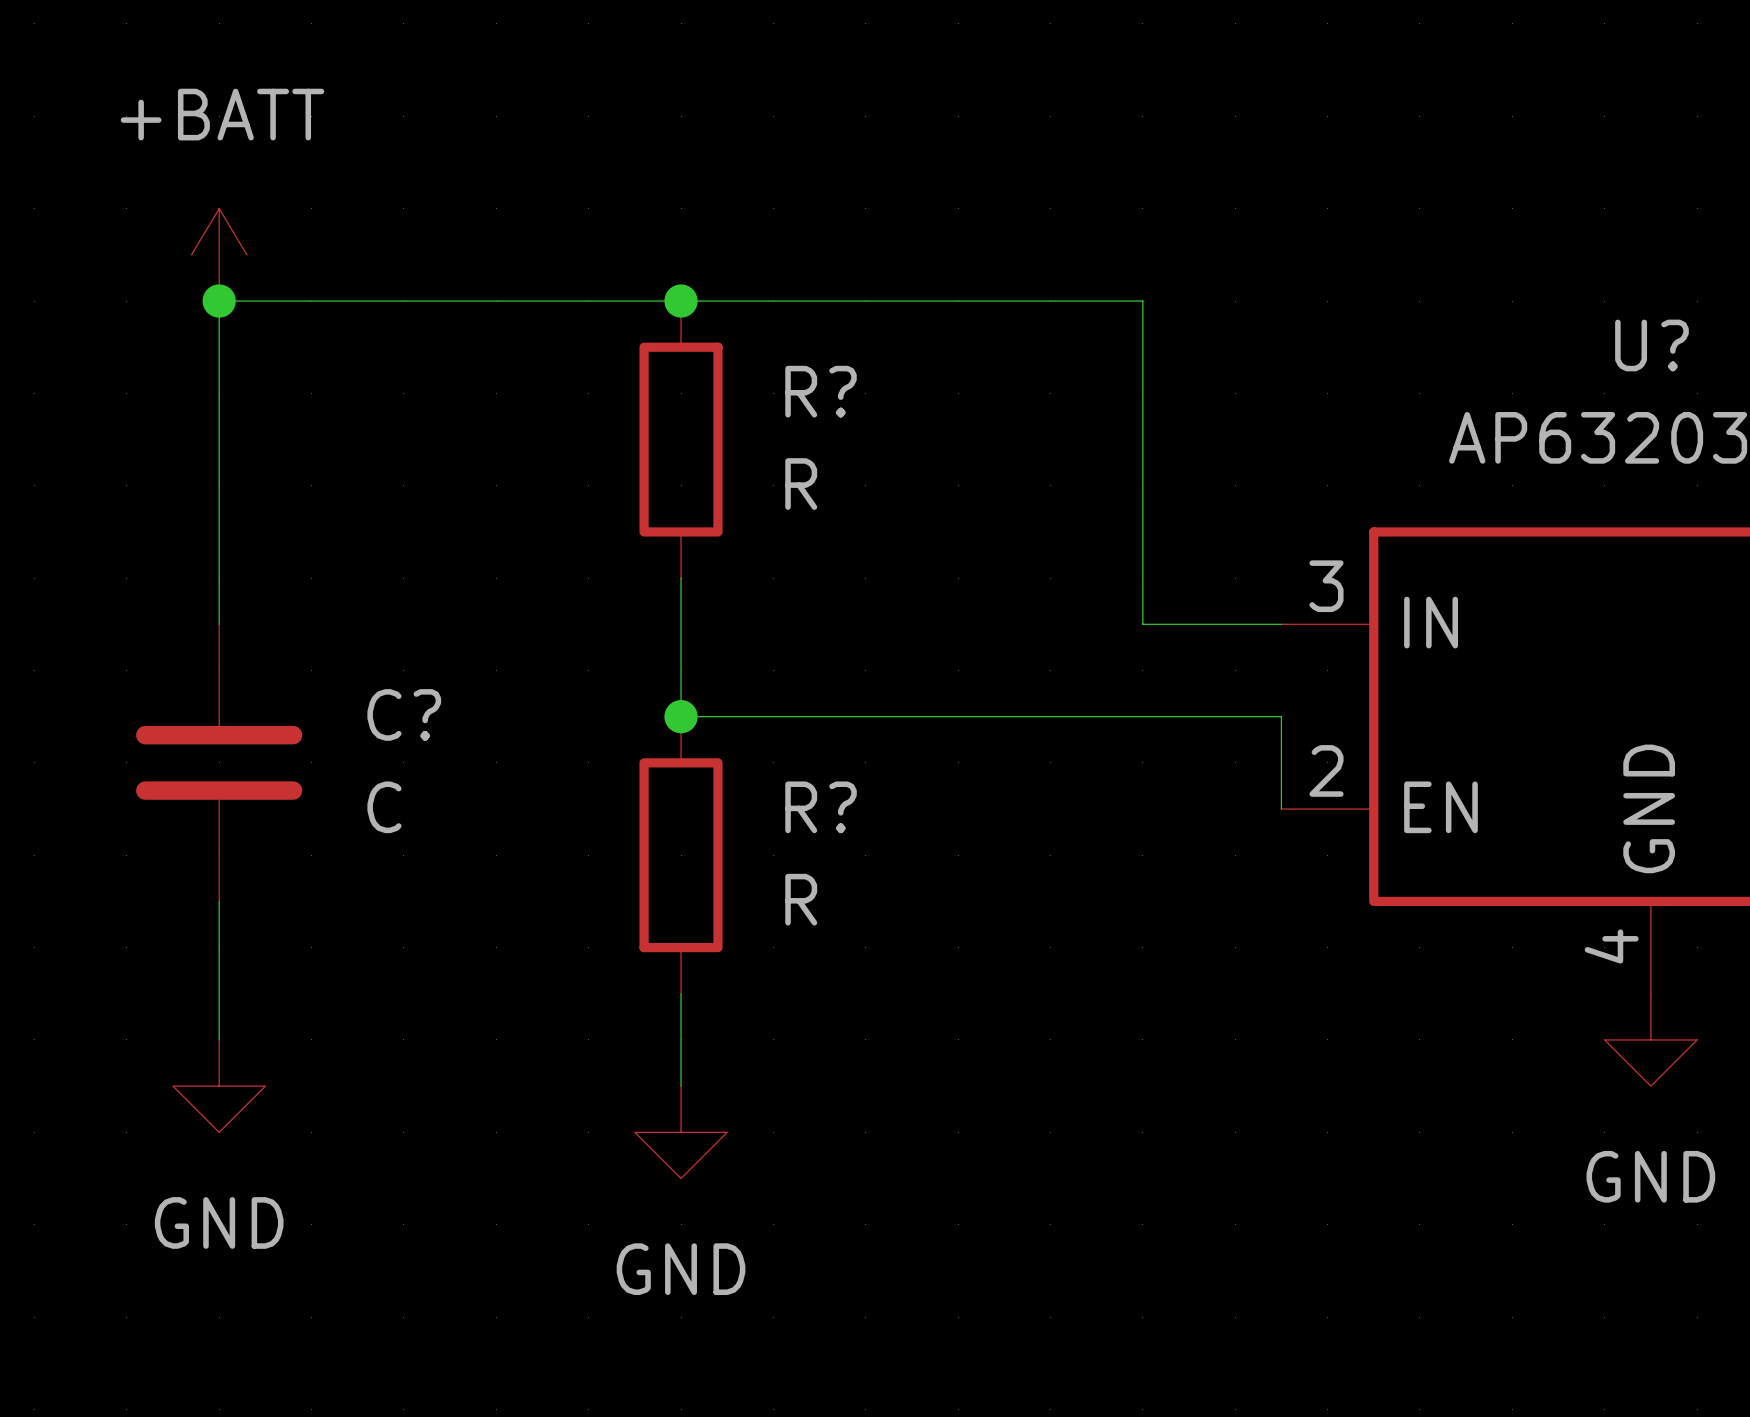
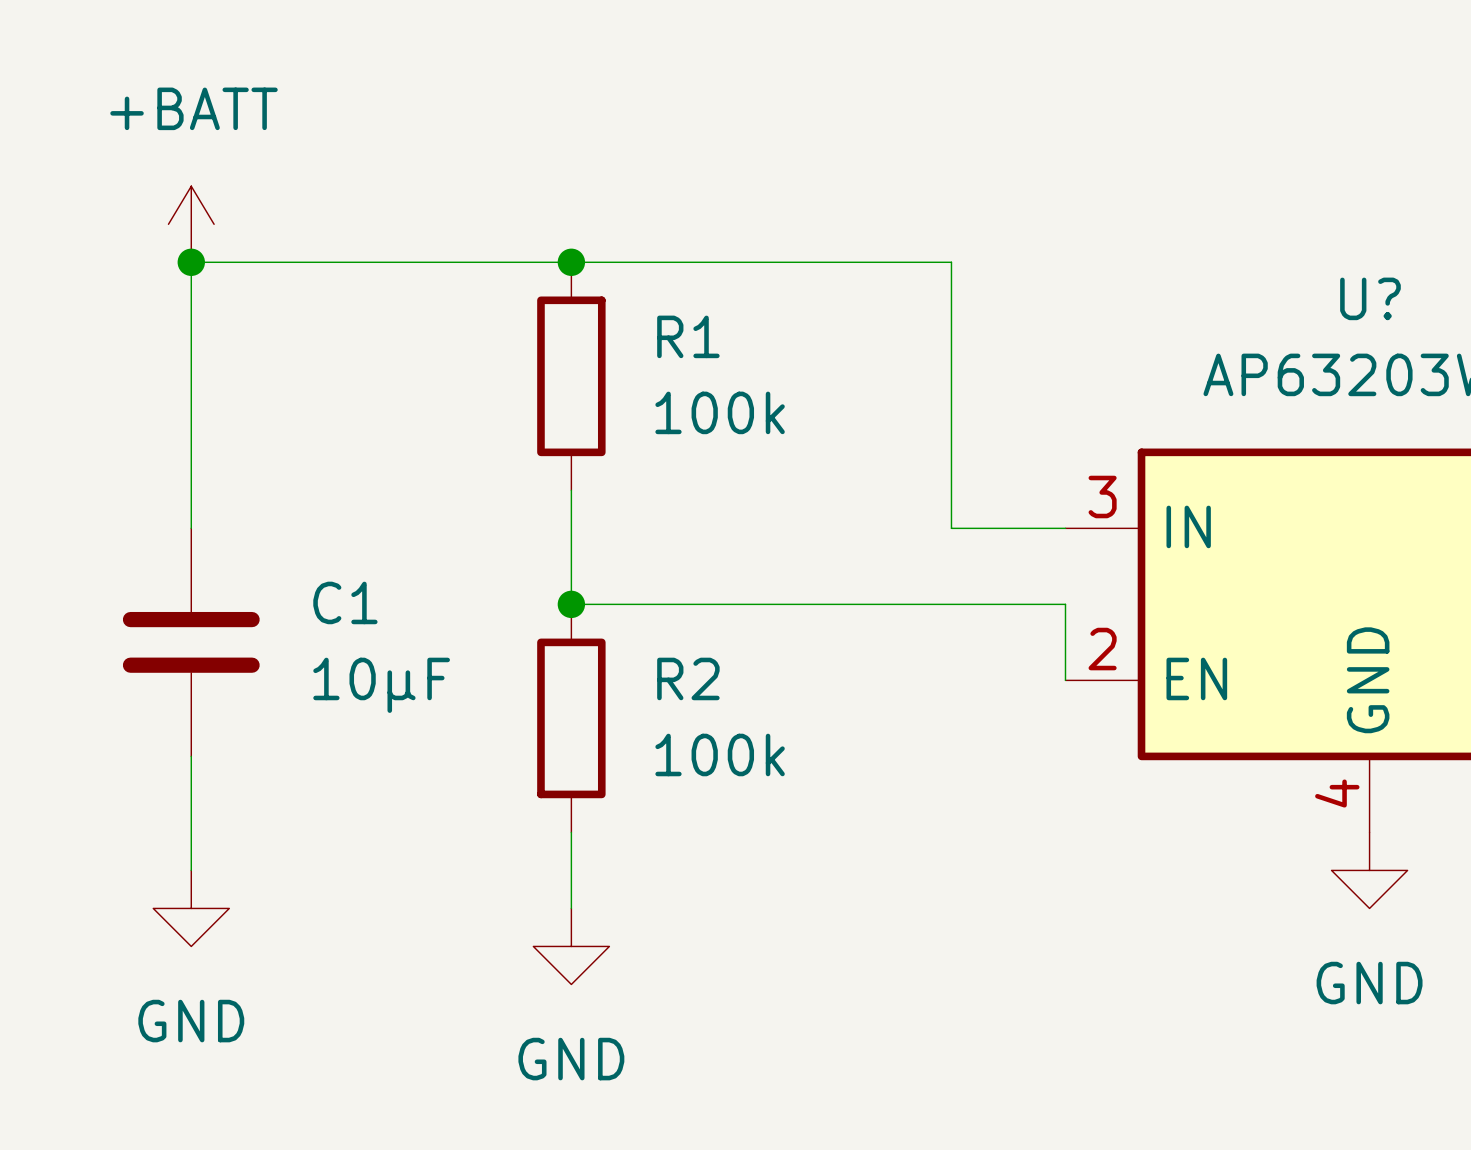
R? name: R? (821, 391) -> R1 (688, 336)
R? value: R (801, 484) -> 100k (720, 412)
C? name: C? (404, 714) -> C1 (345, 602)
C? value: C (384, 807) -> 10µF (381, 685)
R? name: R? (821, 807) -> R2 (688, 678)
R? value: R (801, 899) -> 100k (720, 754)

